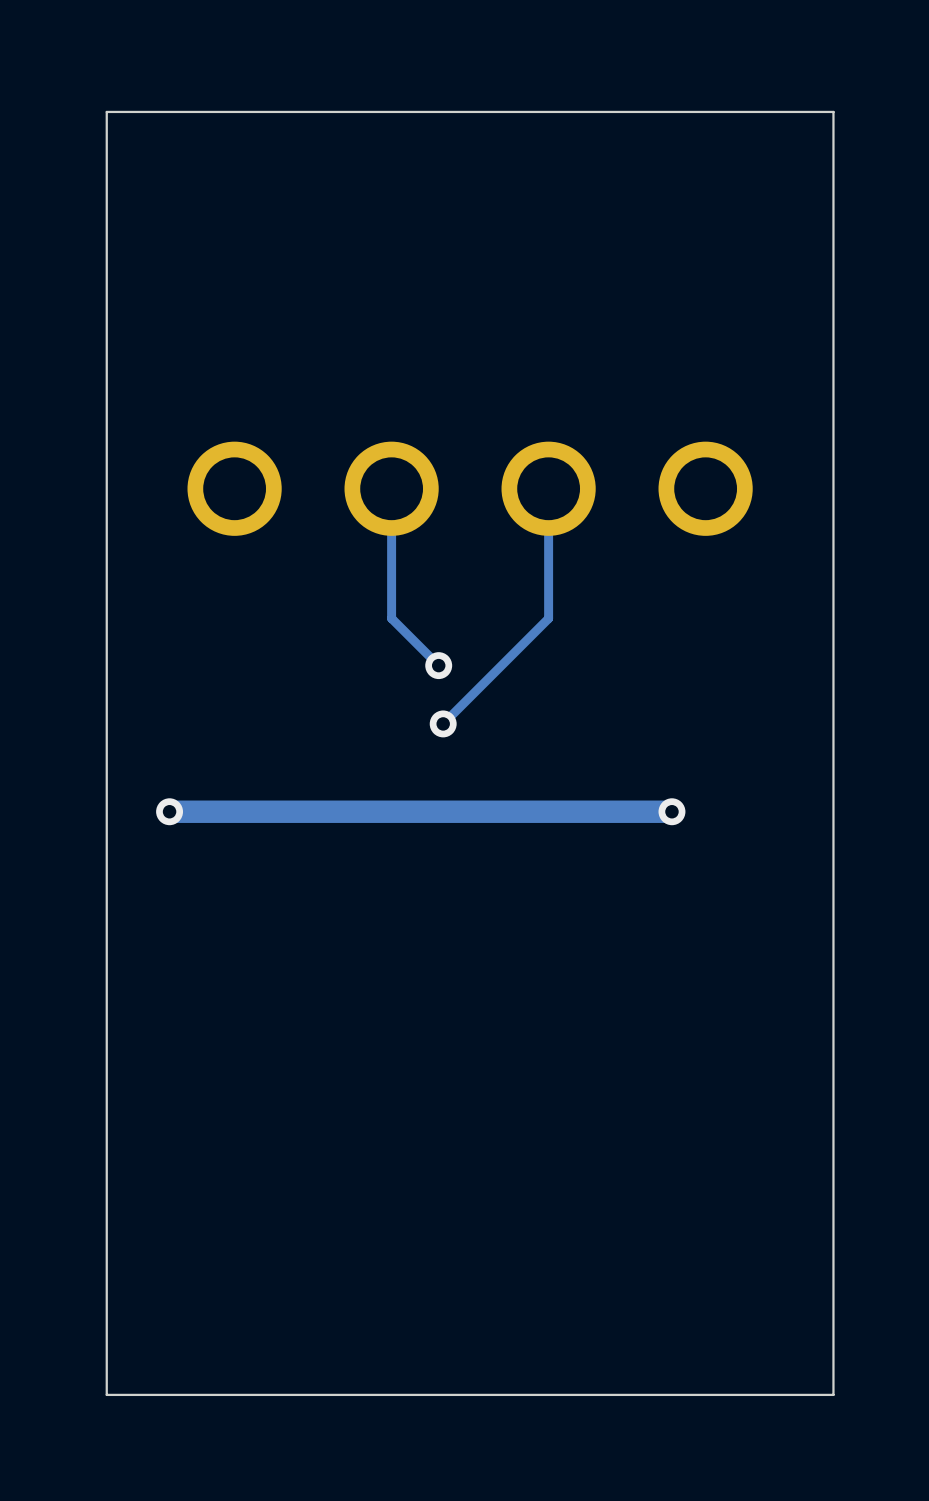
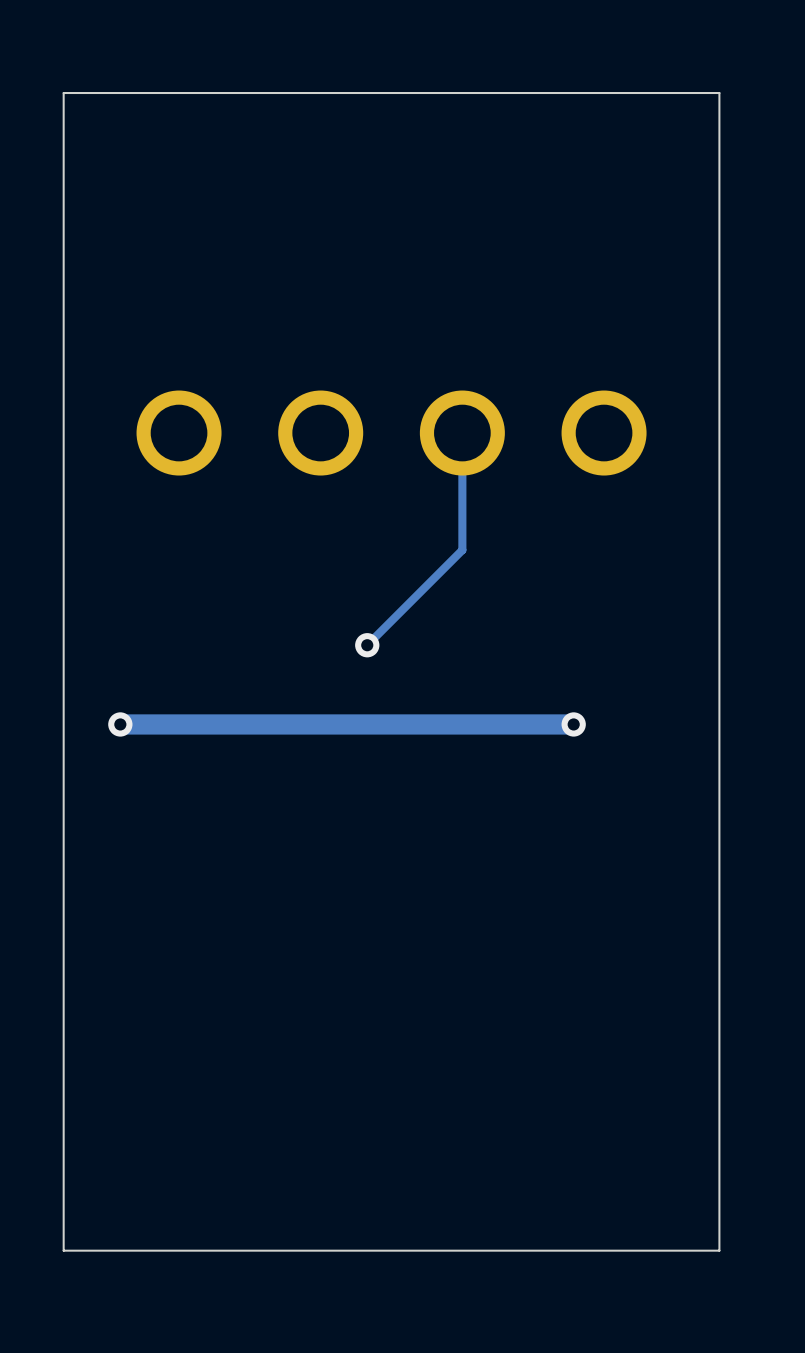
track: (391, 488) (391, 618) (438, 665) -> none
via: (438, 665) -> none

